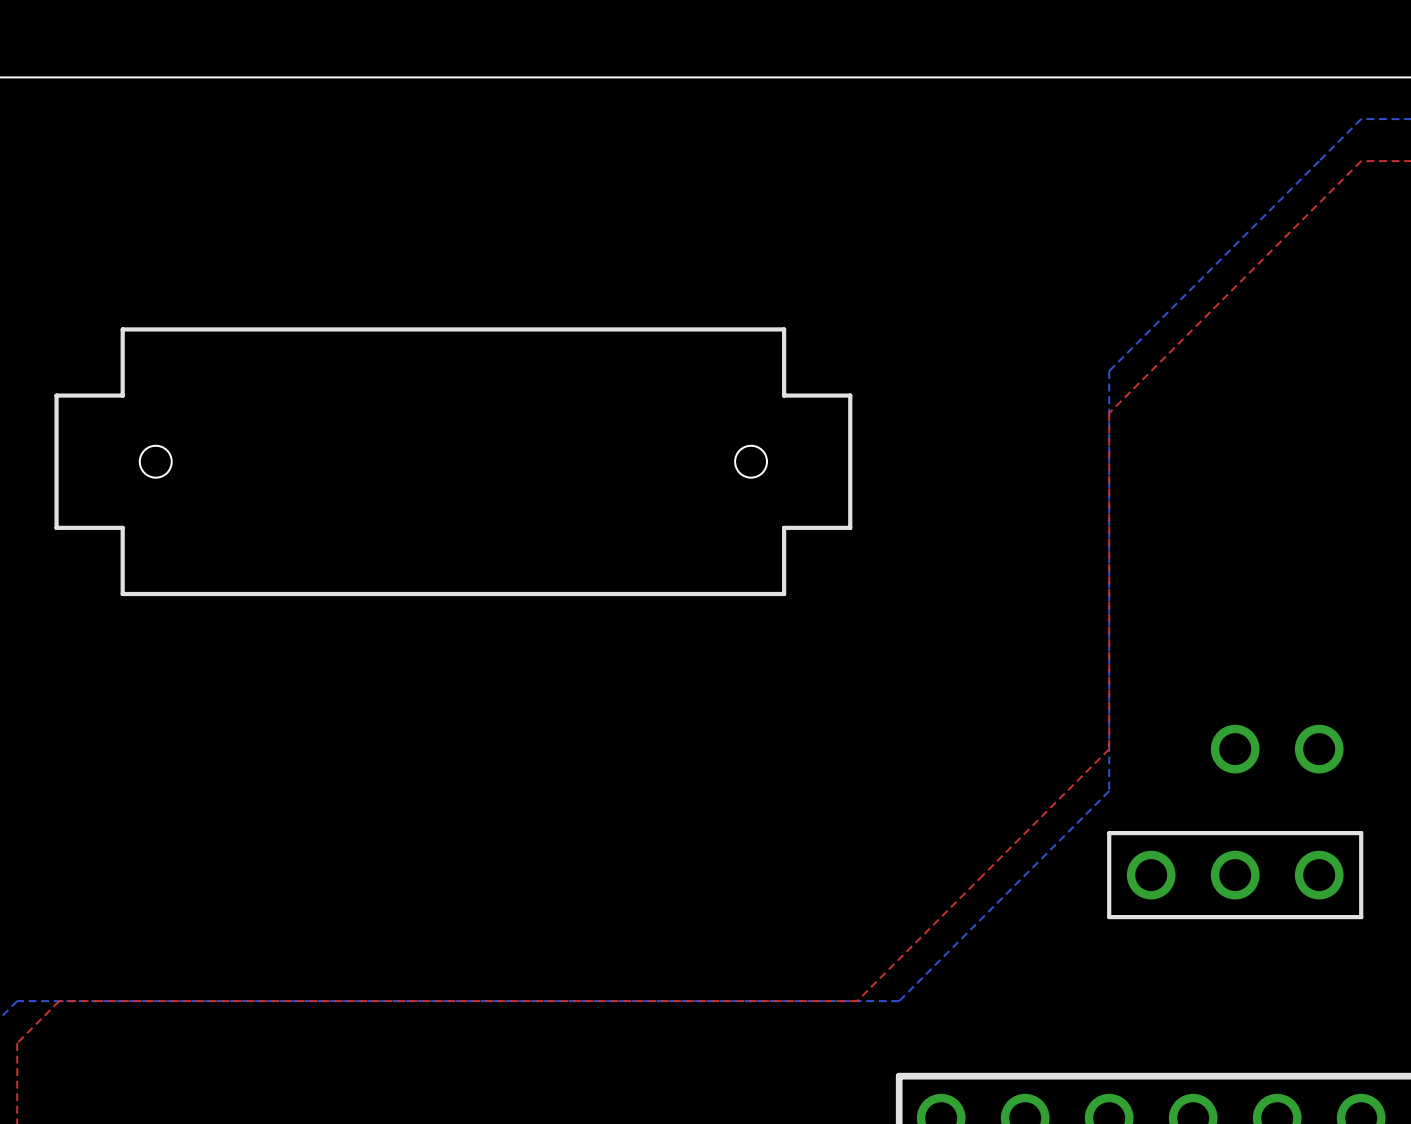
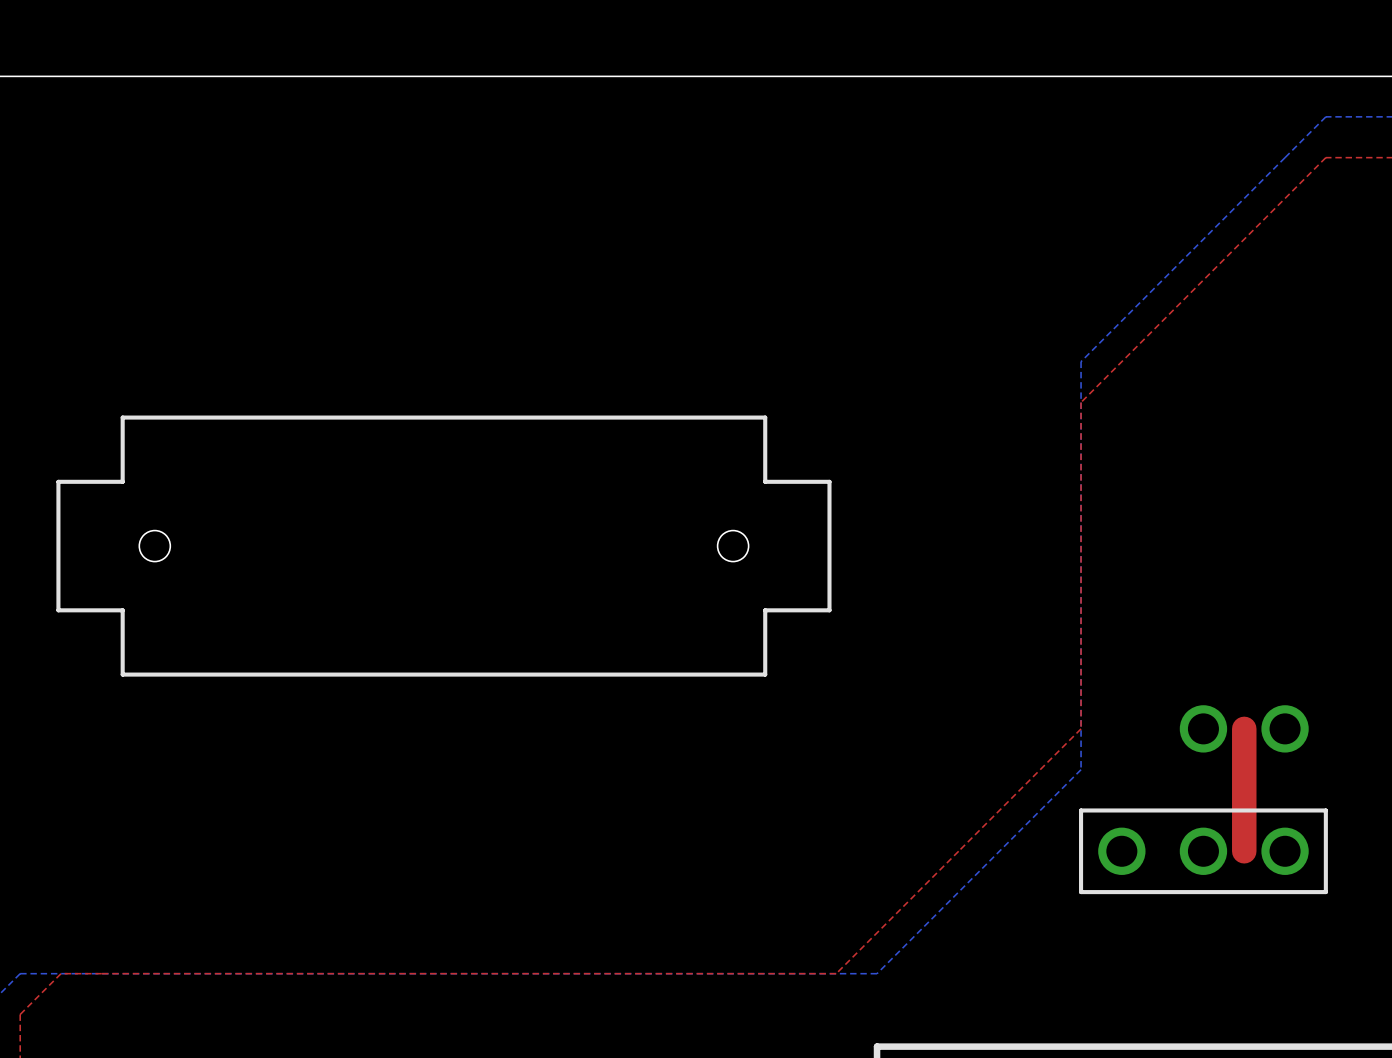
part position: (453, 461) -> (443, 546)
top track: none -> (1244, 728) (1244, 851)

